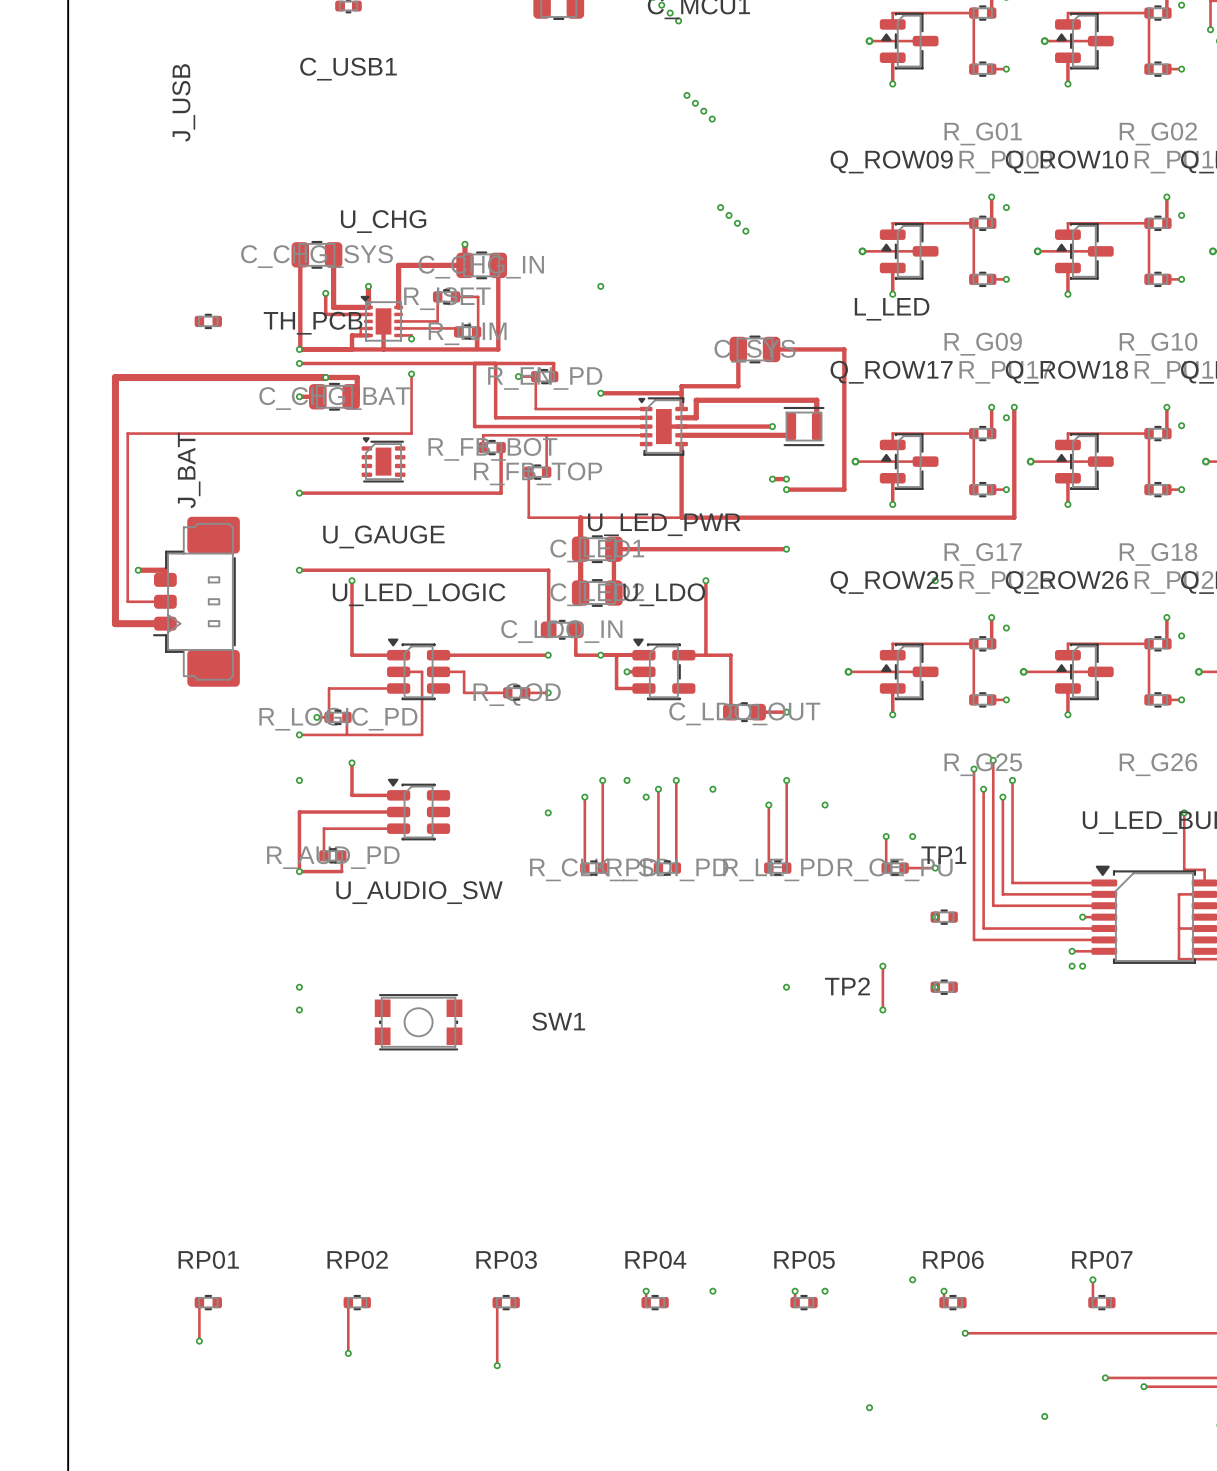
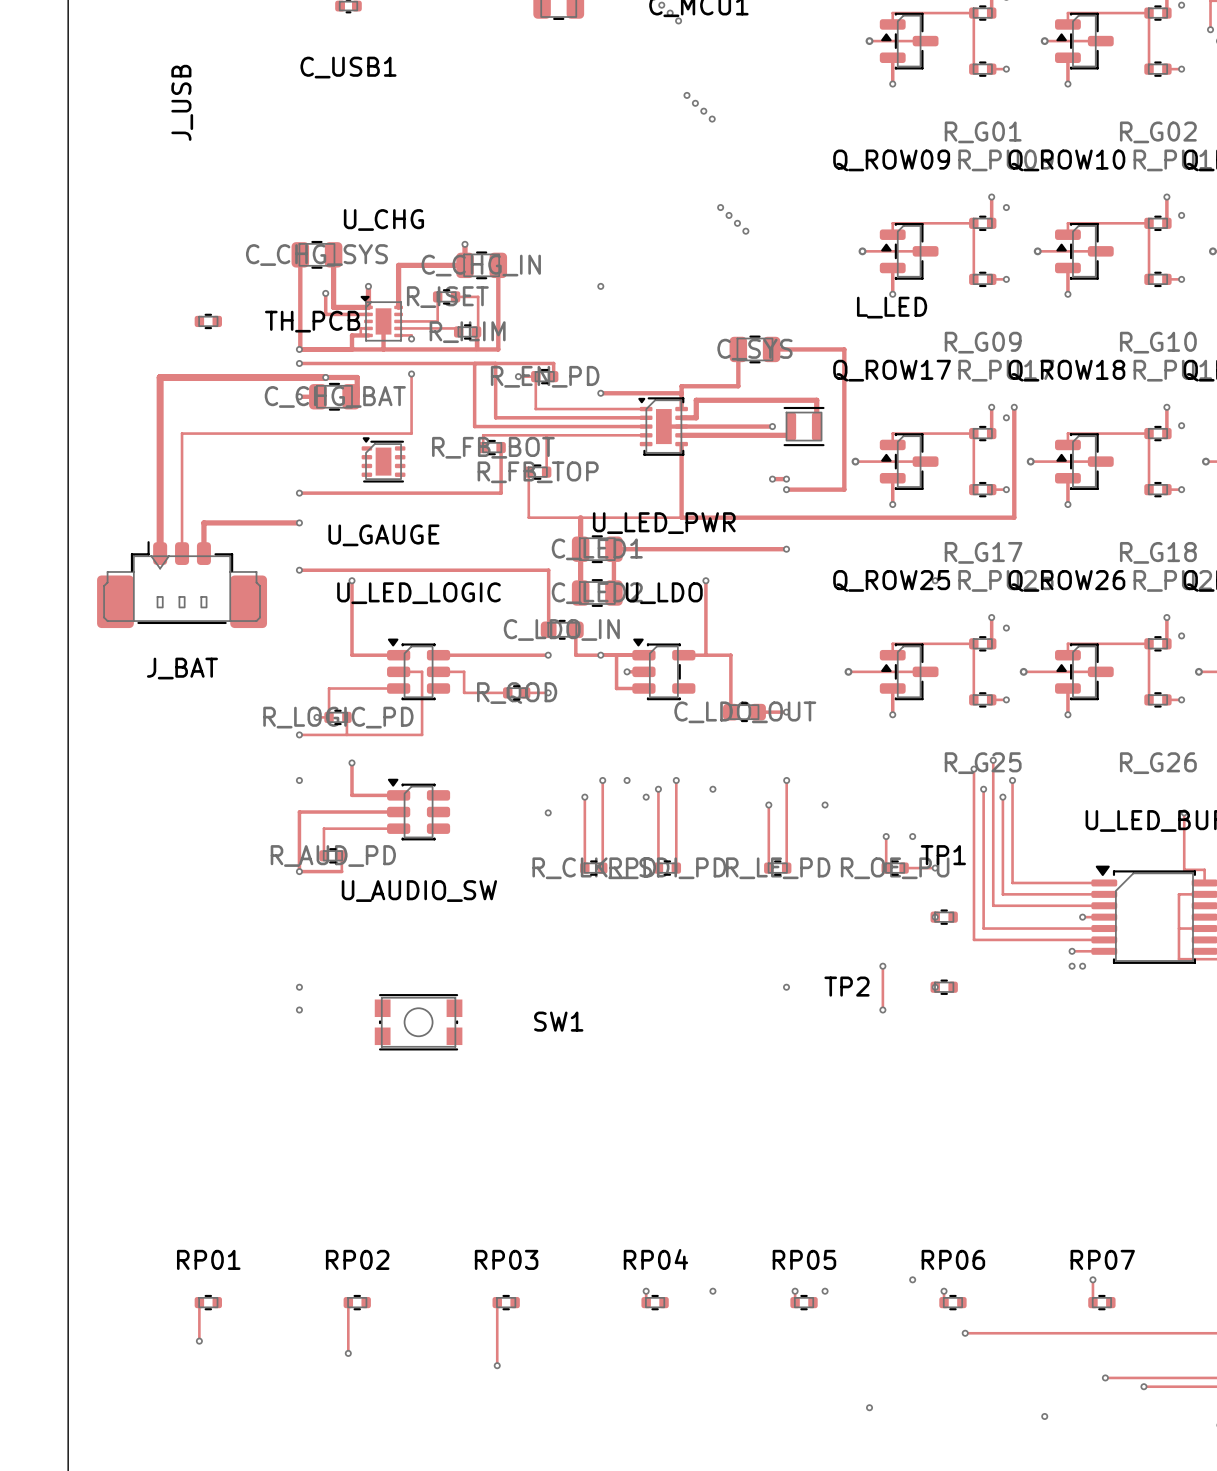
top track: (160, 377) (115, 377) (115, 623) (165, 623) -> (160, 377) (160, 553)
top track: (182, 433) (127, 433) (127, 601) (165, 601) -> (182, 433) (182, 553)
J_BAT name position: J_BAT (189, 470) -> J_BAT (182, 668)
top track: none -> (299, 522) (203, 522) (203, 553)
via: none -> (299, 522)
top track: (138, 570) (165, 570) (165, 579) -> none
via: (138, 570) -> none
J_BAT rotation: 0° (196, 601) -> 90° clockwise (182, 584)

